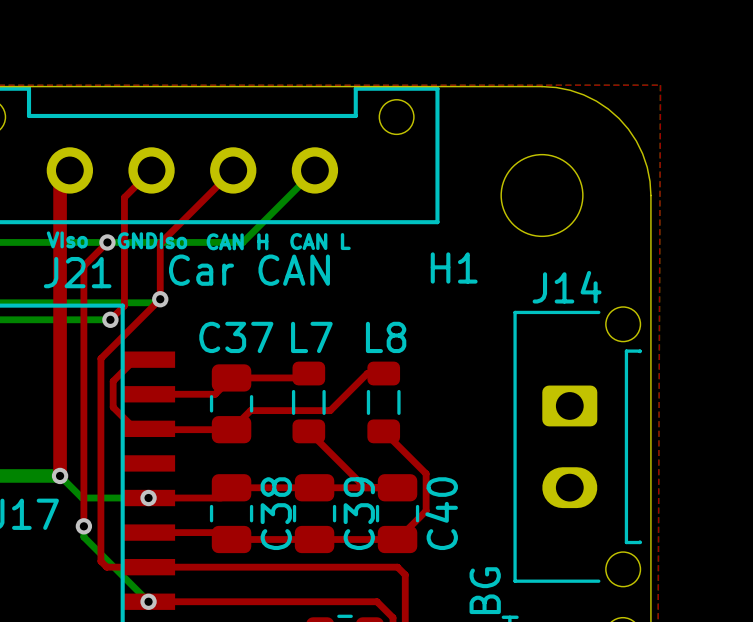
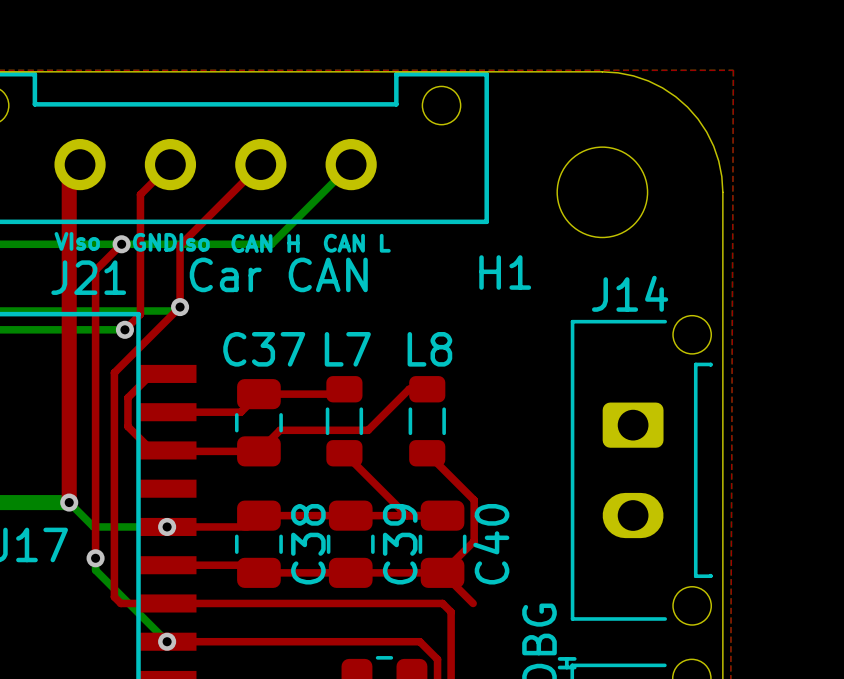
top track: none -> (442, 572) (473, 603)

